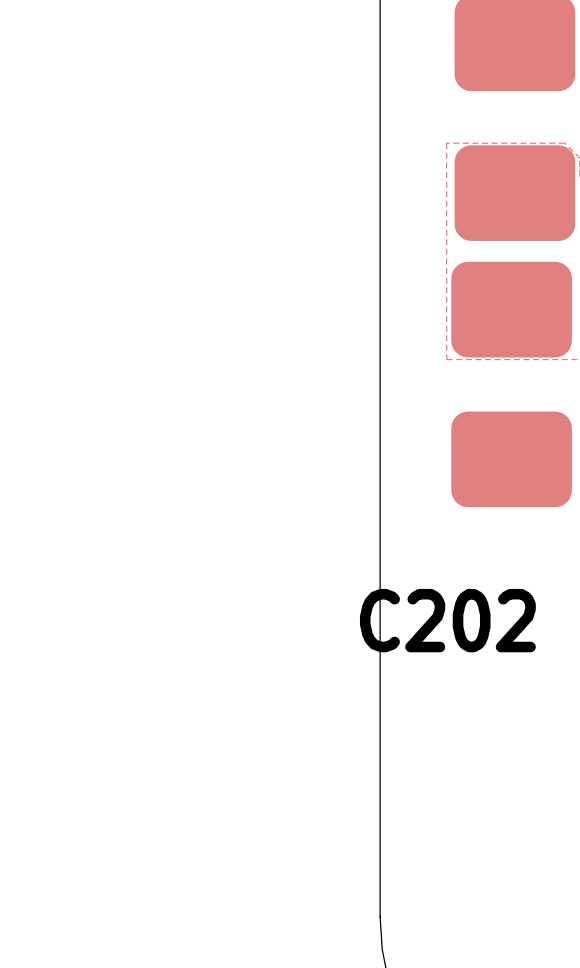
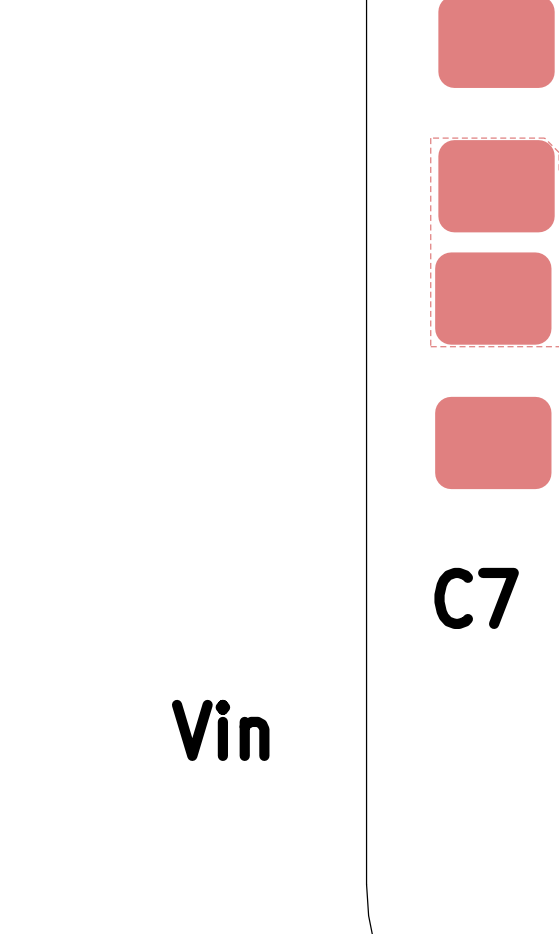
C202 name: C202 (447, 620) -> C7 (476, 598)
text: none -> Vin (220, 730)

